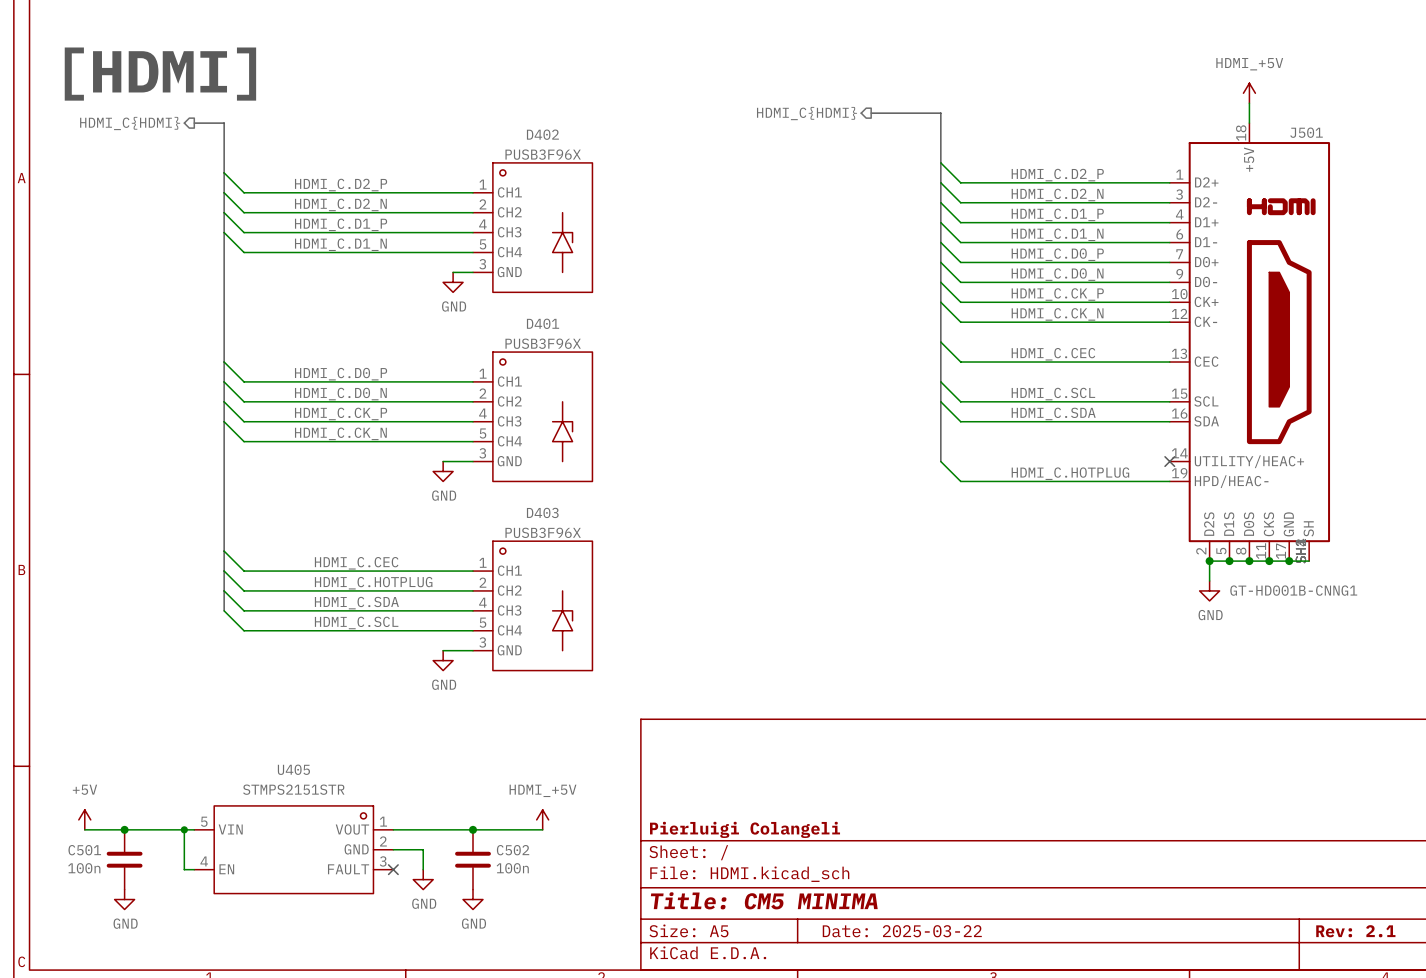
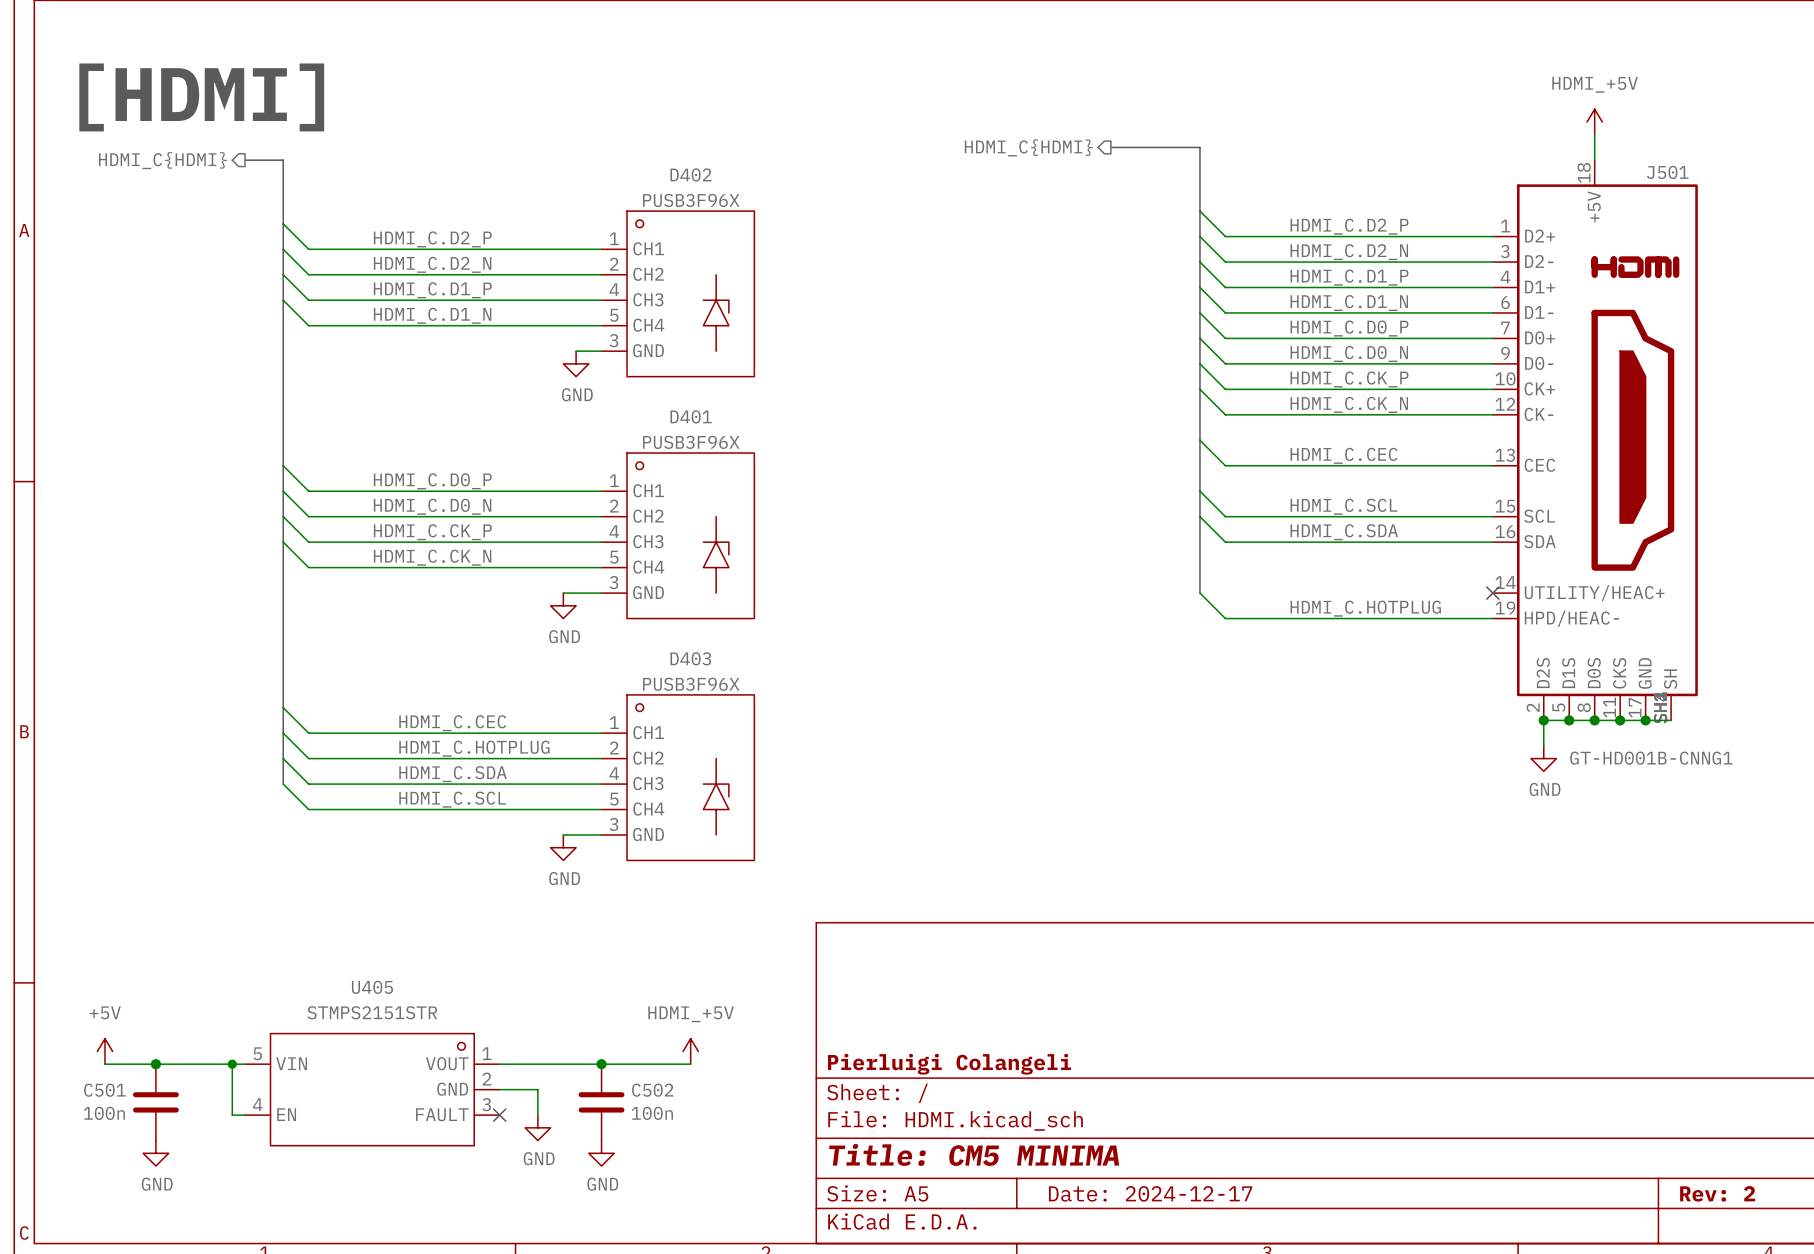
title block: Date: 2025-03-22 (902, 931) -> Date: 2024-12-17 (1150, 1193)
title block: Rev: 2.1 (1355, 931) -> Rev: 2 (1717, 1193)

